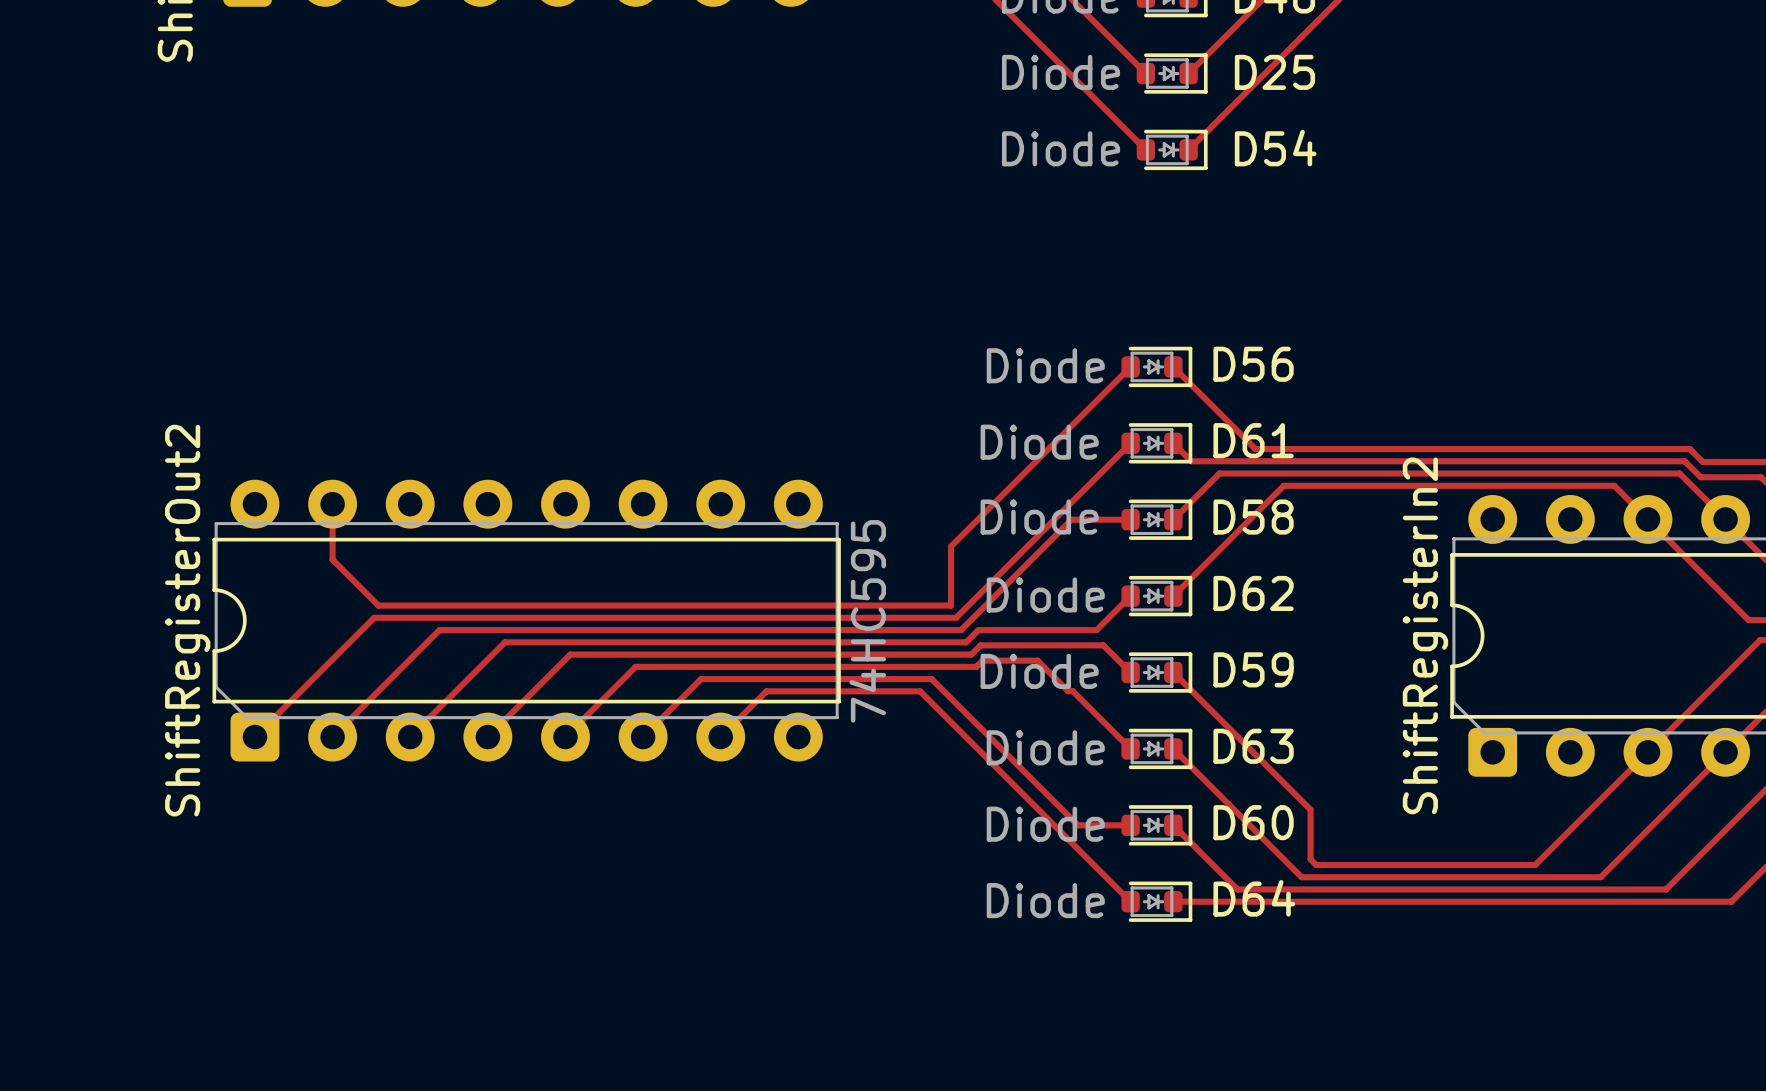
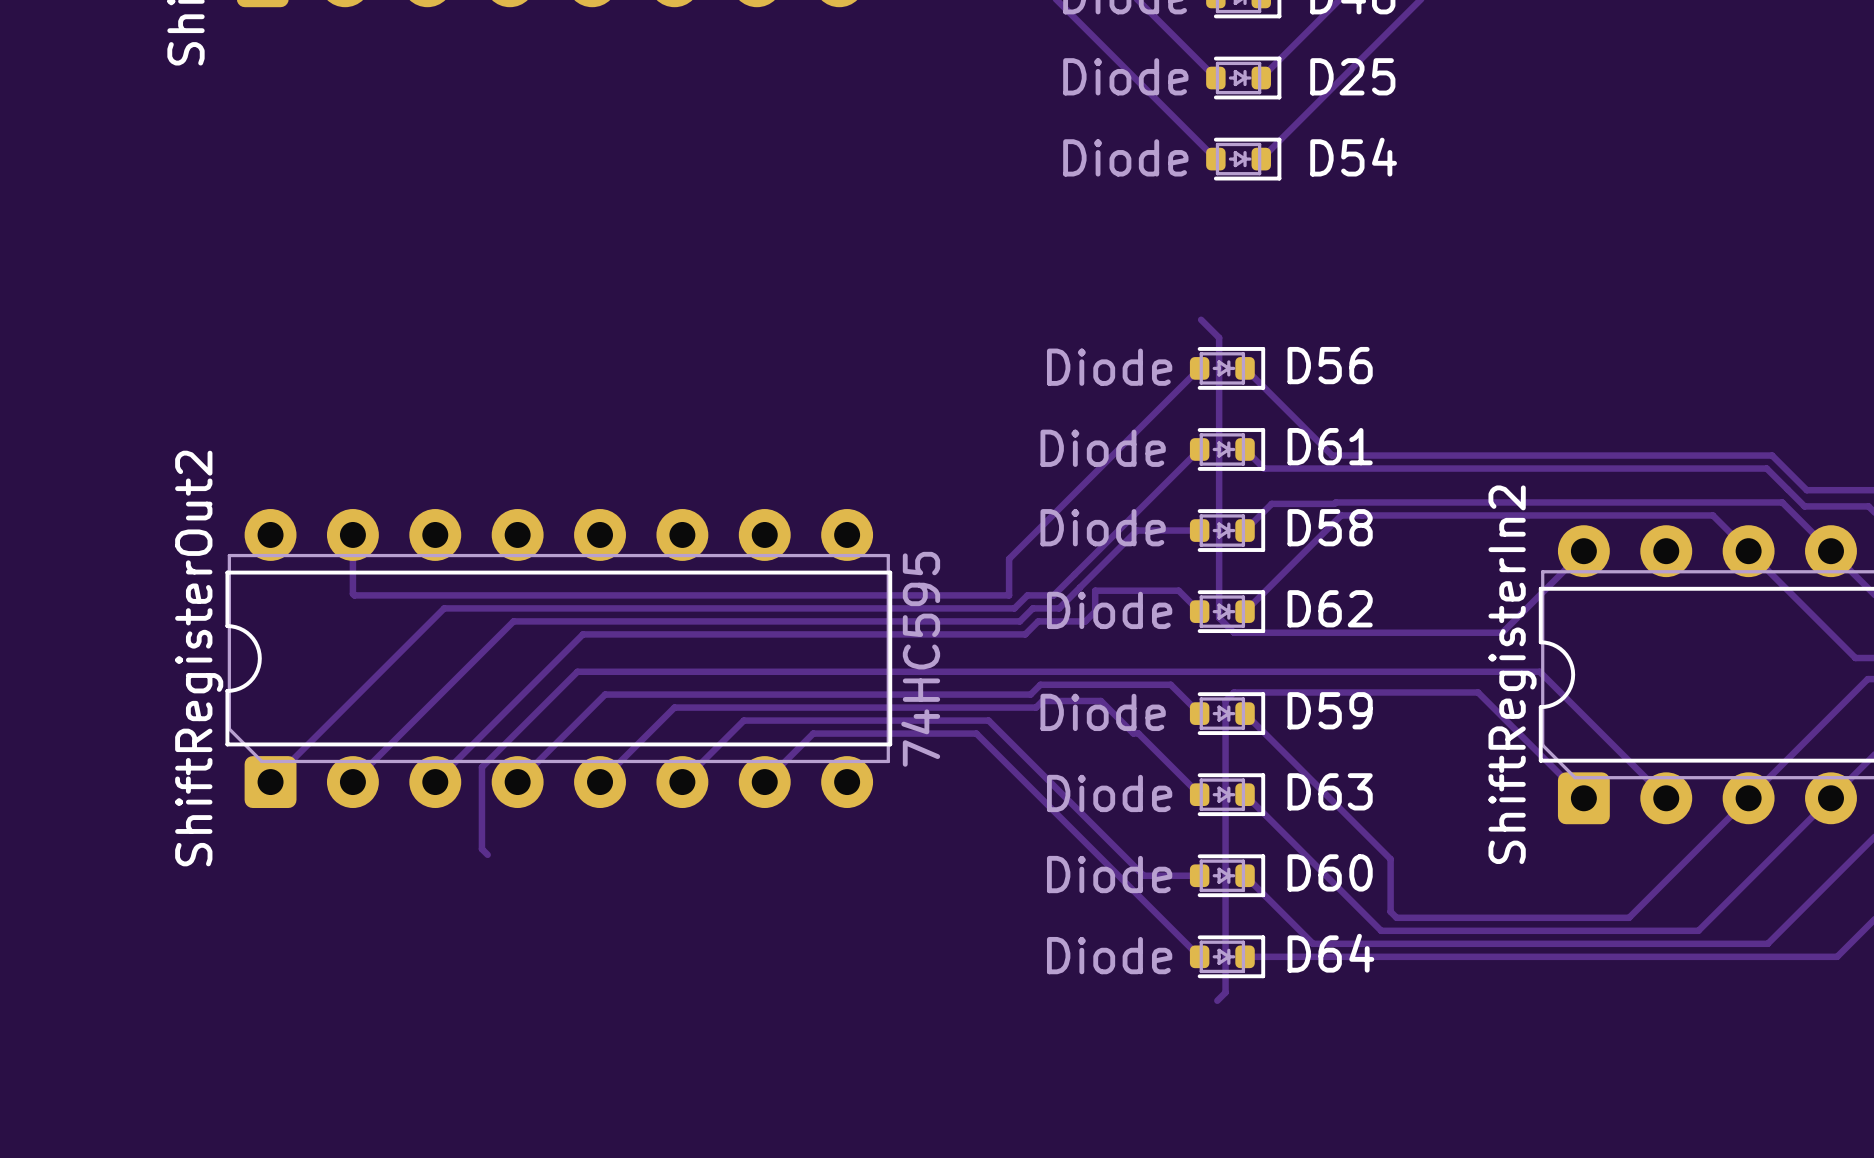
track: none -> (1201, 319) (1219, 337) (1219, 617) (1233, 632) (1502, 632) (1583, 551)
track: (1130, 366) (951, 546) -> (1199, 368) (1009, 558) (1009, 579)
D56 position: (1156, 366) -> (1227, 368)
track: (1173, 366) (1255, 449) (1689, 449) -> (1245, 368) (1332, 455) (1772, 455) (1793, 476)
track: (1130, 443) (956, 617) (374, 617) -> (1199, 449) (1053, 595) (1027, 595) (1014, 608) (444, 608) (397, 655)
D61 position: (1156, 443) -> (1227, 449)
track: (1173, 443) (1191, 461) (1684, 461) -> (1245, 449) (1264, 468) (1766, 468) (1787, 489)
track: (1258, 473) (1219, 473) (1173, 519) -> (1335, 502) (1271, 503) (1245, 530)
track: (1283, 485) (1173, 596) -> (1362, 515) (1341, 515) (1245, 611)
track: (1130, 519) (1071, 519) (961, 630) (439, 630) -> (1199, 530) (1136, 530) (1059, 608) (1032, 608) (1019, 621) (513, 621) (466, 668)
D58 position: (1156, 519) -> (1227, 530)
track: (334, 561) (378, 605) (951, 605) (951, 561) -> (354, 595) (1009, 595)
track: (1130, 596) (1096, 630) (978, 630) (966, 642) (504, 642) -> (1199, 611) (1178, 590) (1095, 590) (1095, 611) (1085, 621) (1038, 621) (1025, 634) (582, 634) (535, 681)
D62 position: (1156, 596) -> (1227, 611)
track: none -> (1583, 798) (1478, 692) (1233, 692) (1225, 700) (1225, 992) (1217, 1000)
track: none -> (1666, 798) (1539, 671) (577, 671) (481, 767) (481, 849) (487, 854)

